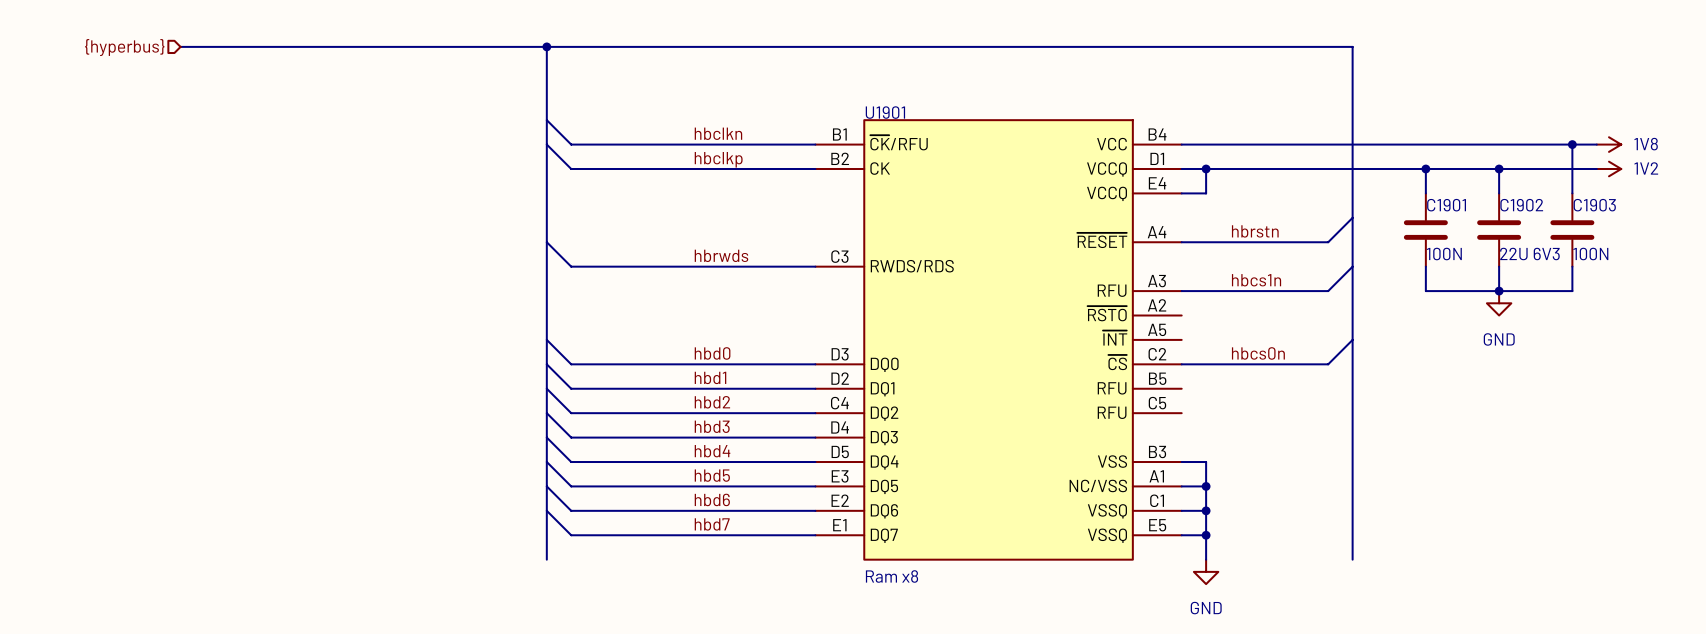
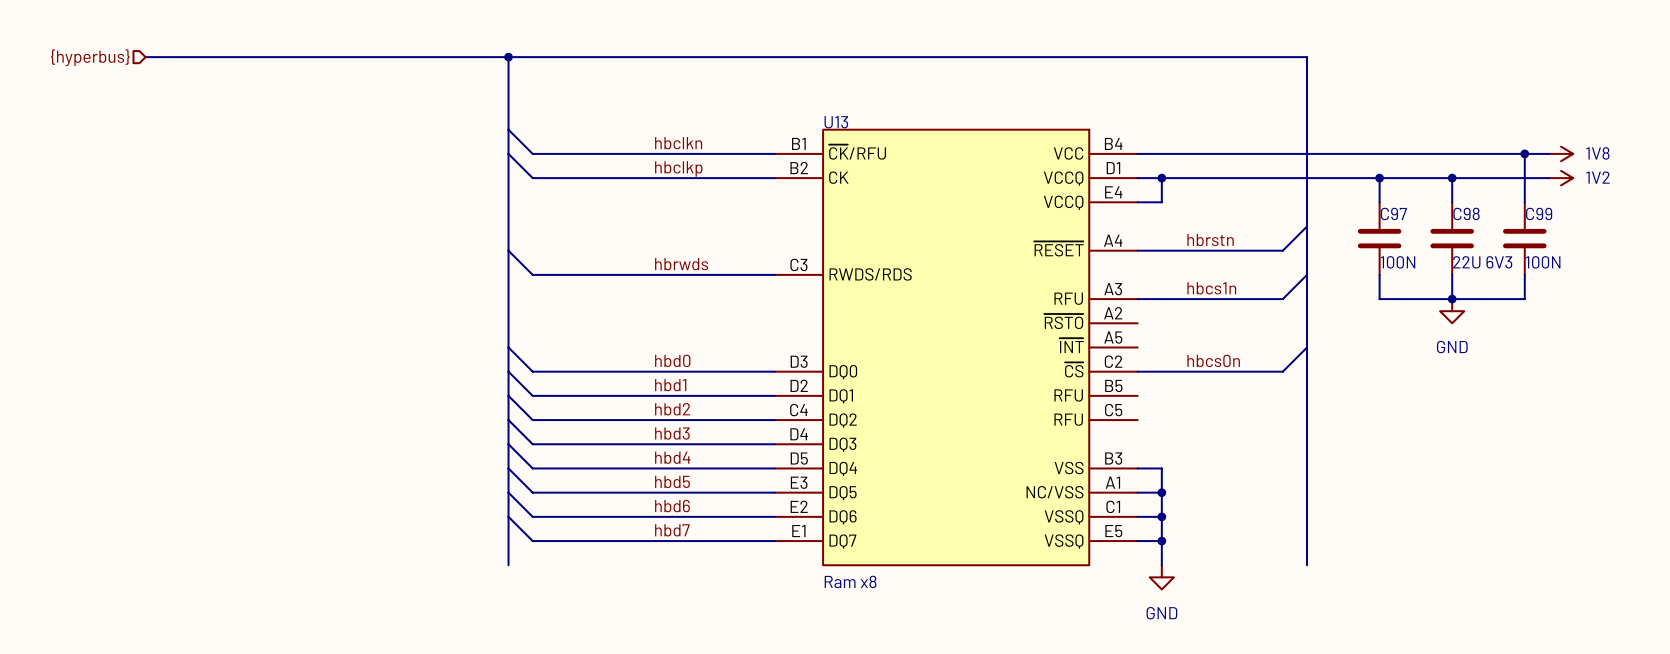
U1901 name: U1901 (885, 112) -> U13 (836, 122)
C1901 name: C1901 (1446, 205) -> C97 (1393, 213)
C1902 name: C1902 (1521, 205) -> C98 (1466, 213)
C1903 name: C1903 (1594, 205) -> C99 (1539, 213)

